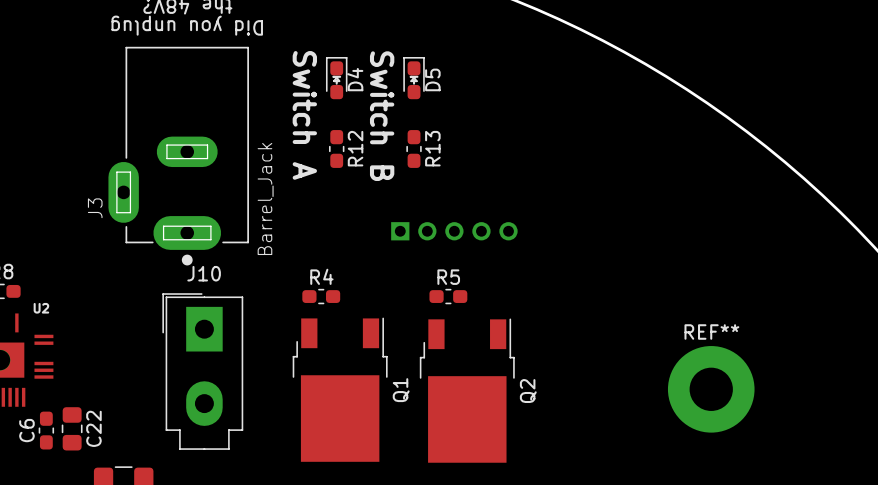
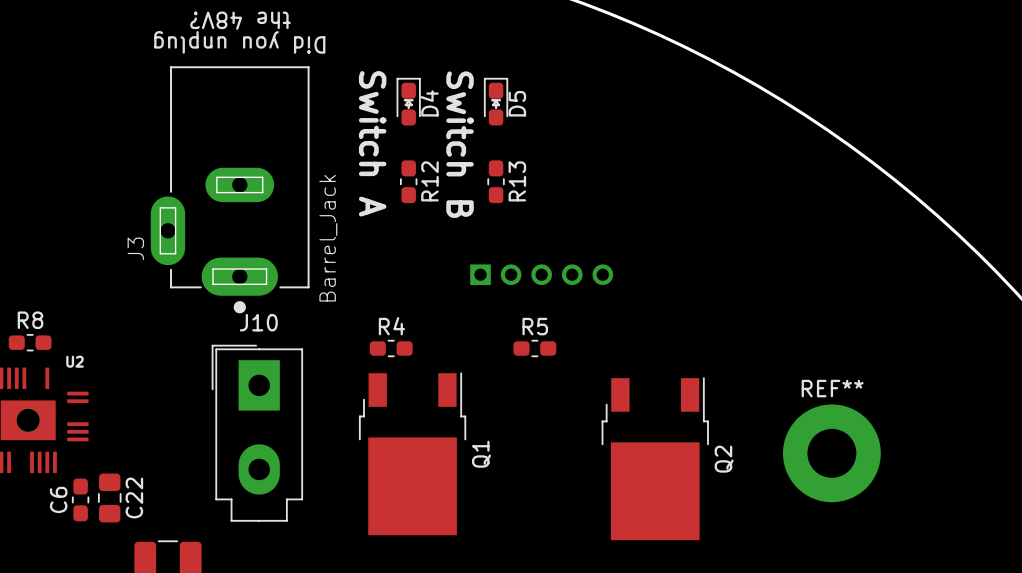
Q2 position: (467, 390) -> (655, 458)

